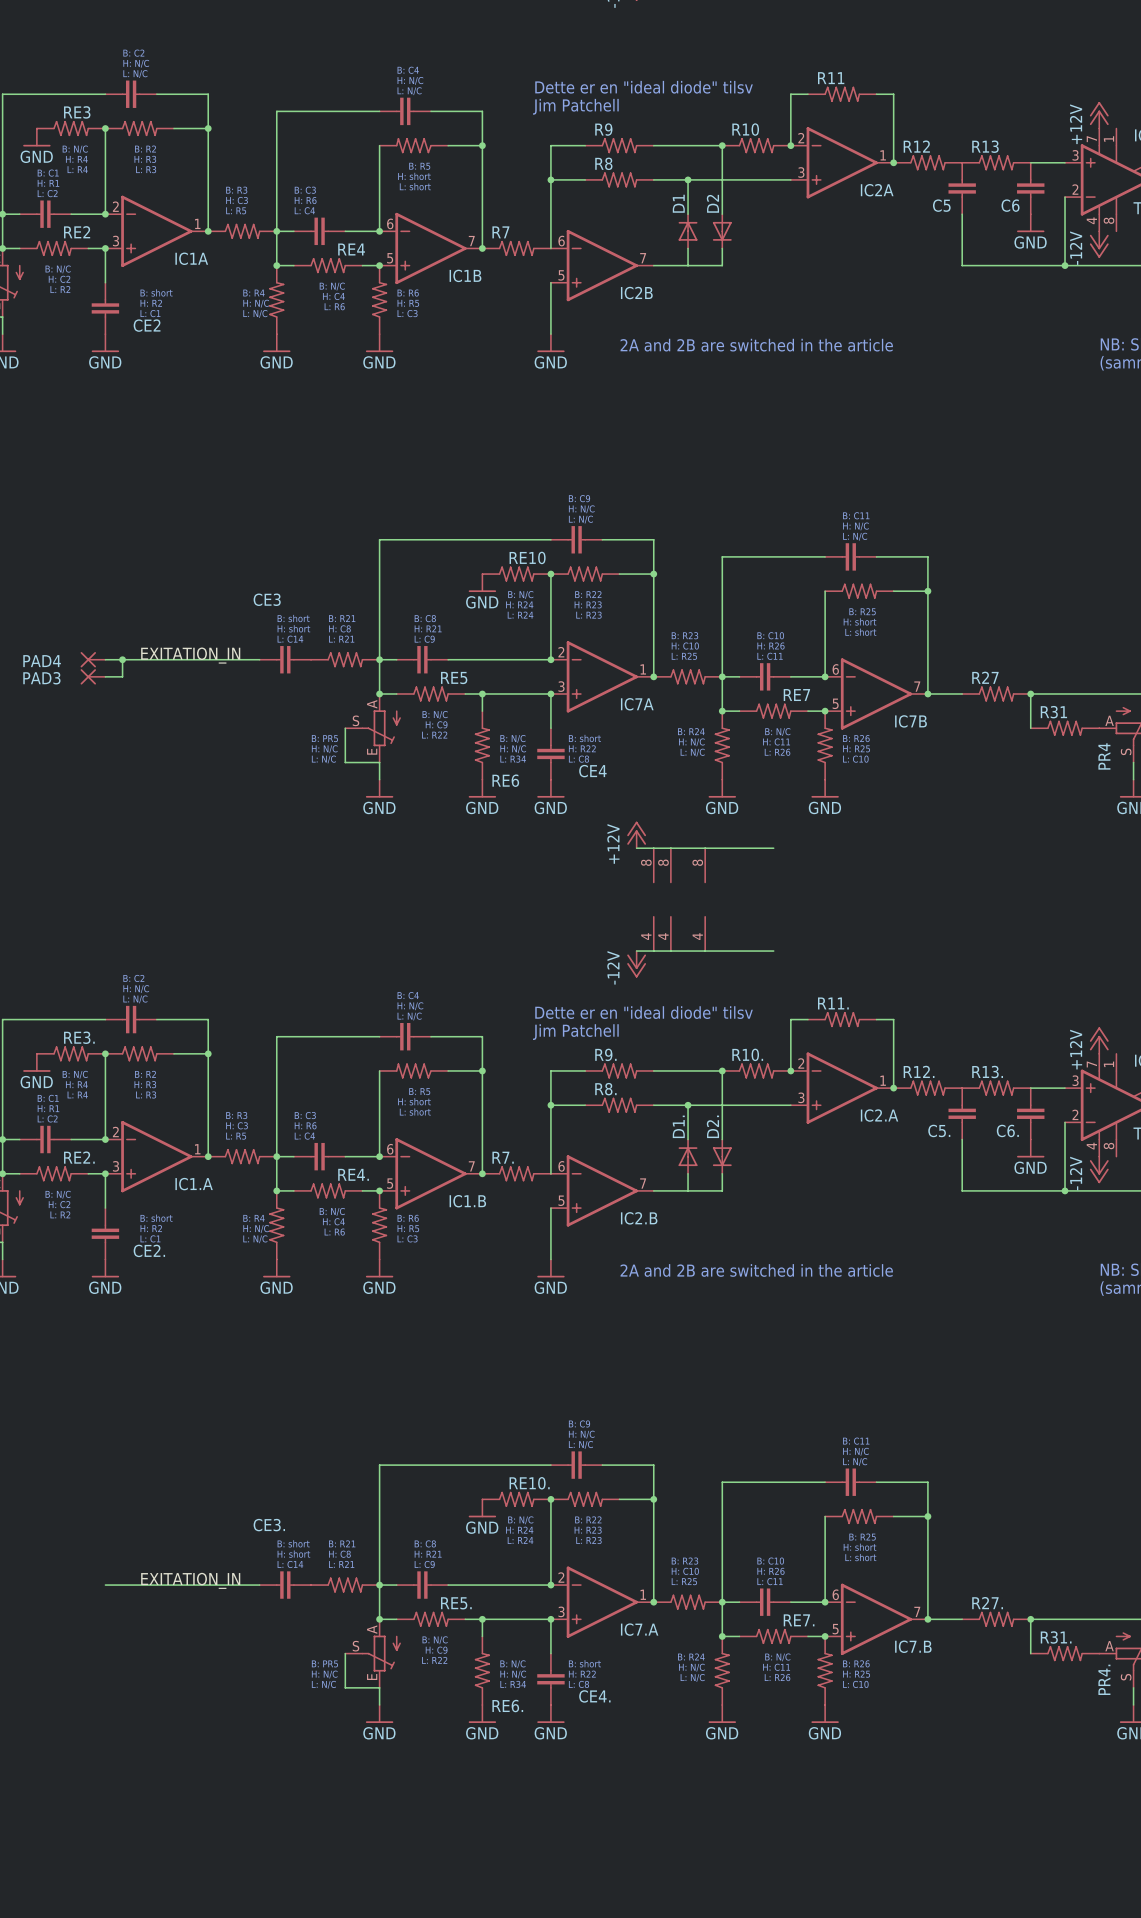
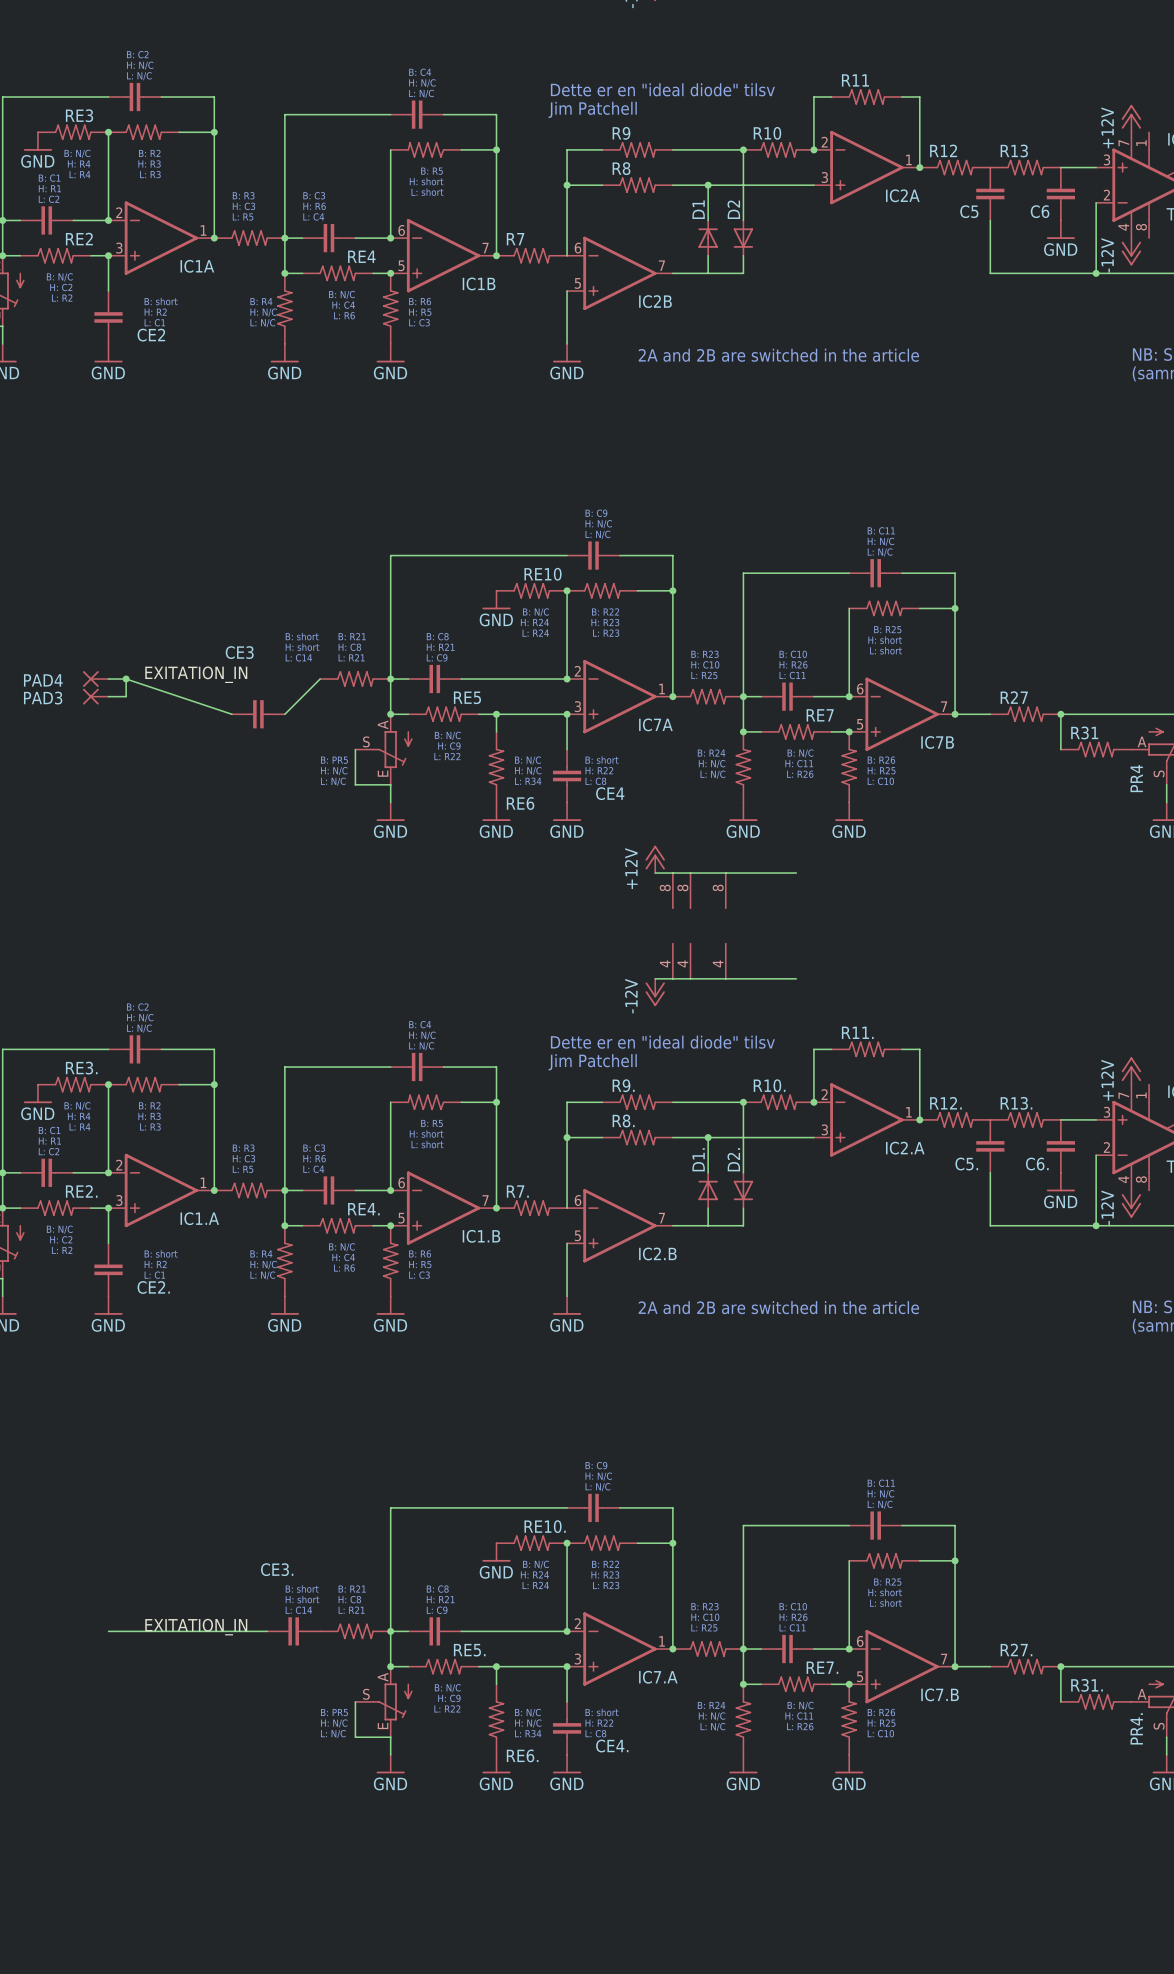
wire: (122, 659) (259, 659) -> (126, 679) (231, 714)
CE3 position: (285, 659) -> (258, 714)
wire: none -> (320, 679) (284, 714)

